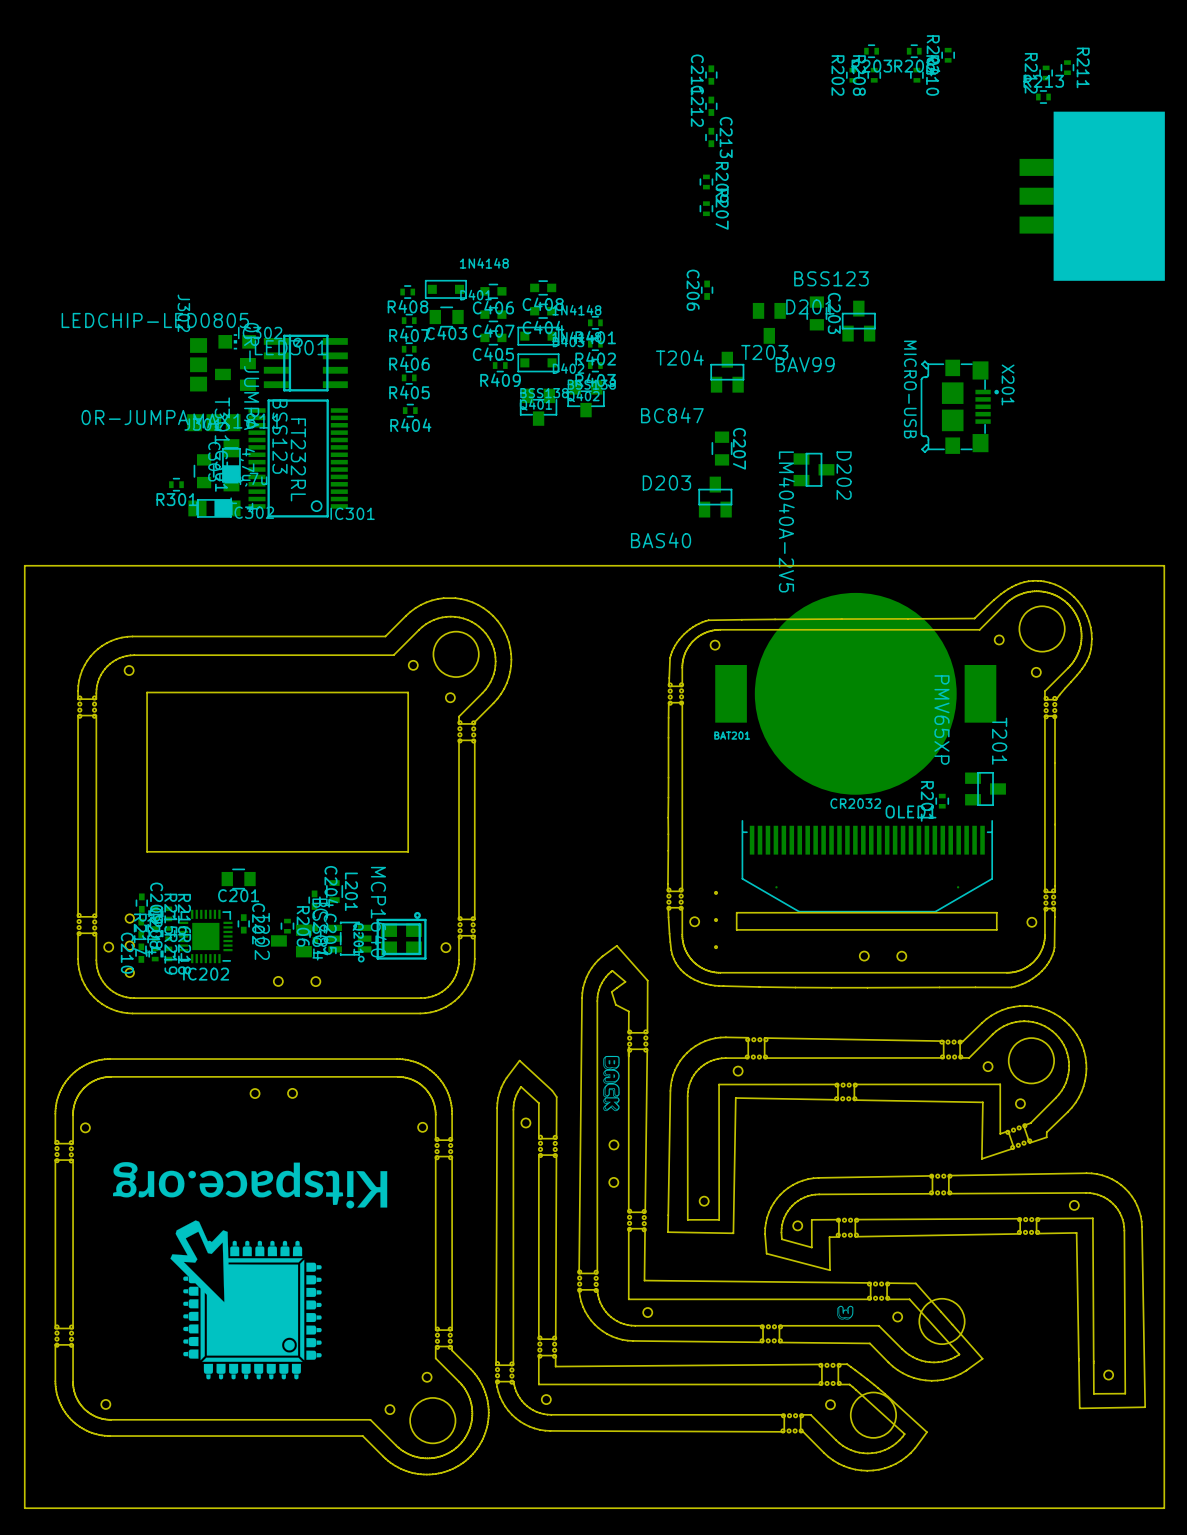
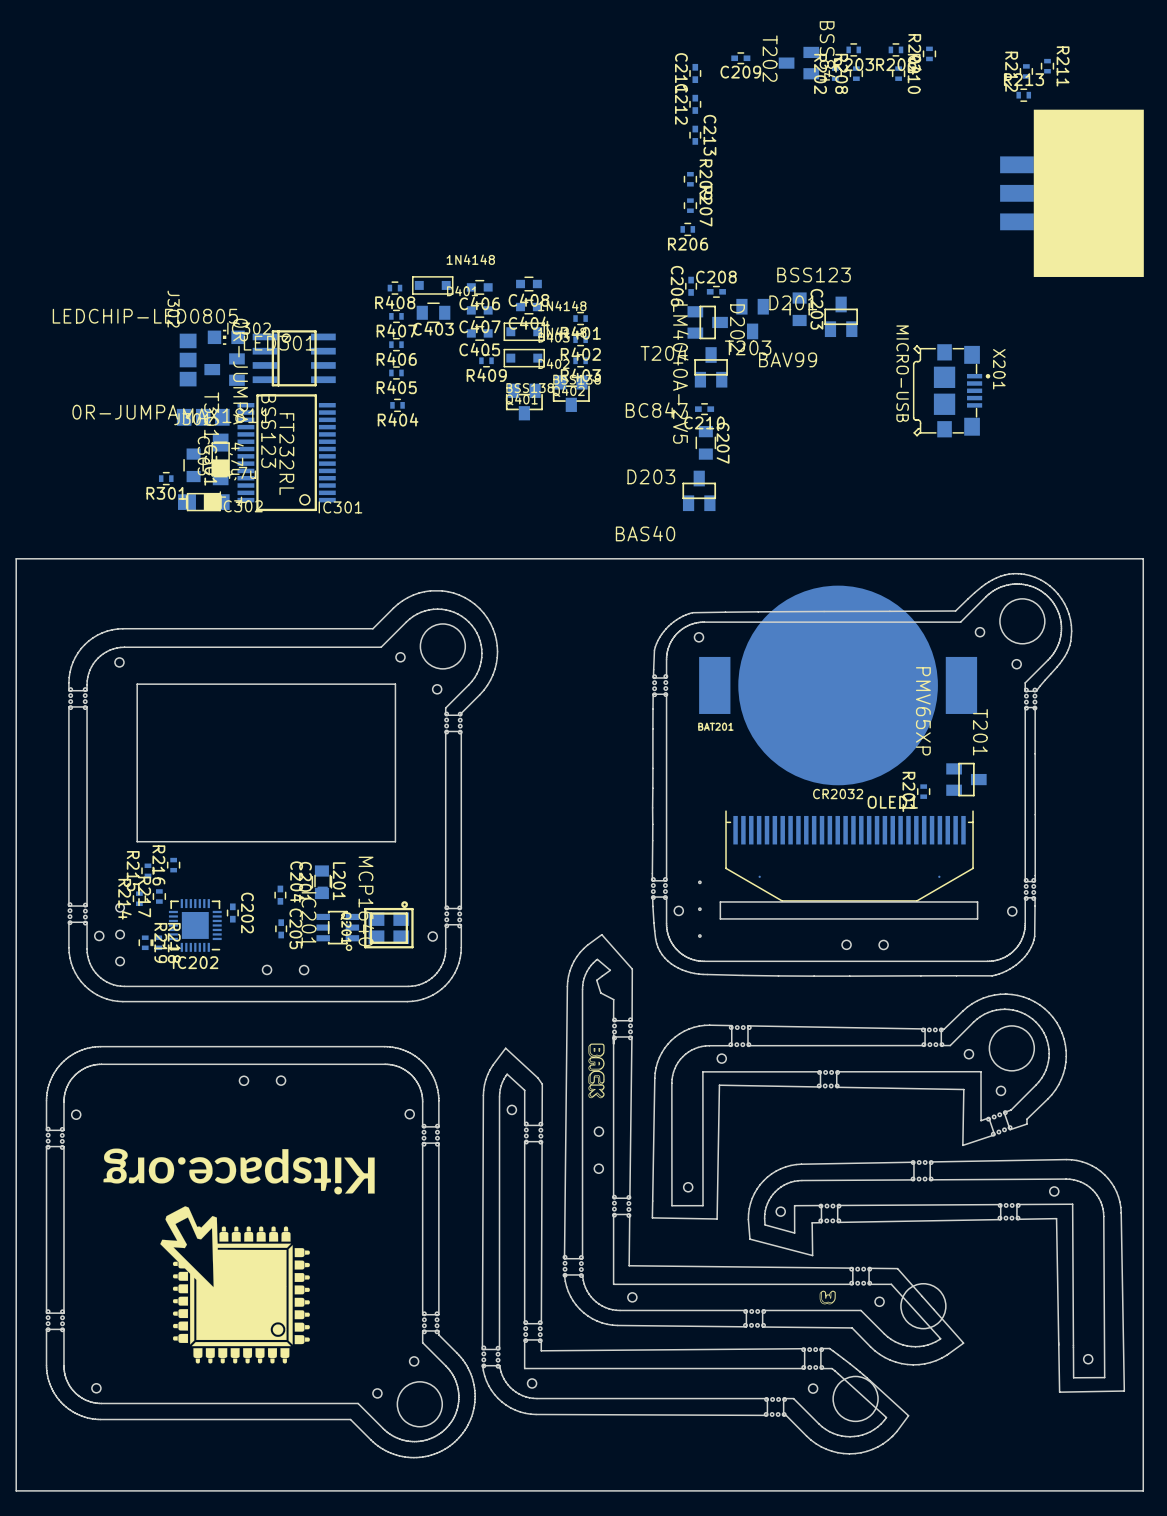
X201 position: (959, 406) -> (951, 390)
D202 position: (813, 469) -> (707, 322)
C201 rotation: 0° (238, 879) -> 90° clockwise (321, 882)
C201 position: (238, 879) -> (321, 882)
C204 position: (314, 900) -> (280, 895)
C209 rotation: 0° (141, 903) -> 90° clockwise (740, 58)
C209 position: (141, 903) -> (740, 58)
R215 position: (155, 913) -> (147, 870)
R216 position: (168, 913) -> (173, 865)
R215 name position: R215 (170, 913) -> R215 (133, 871)
R216 name position: R216 (184, 914) -> R216 (158, 865)
R206 rotation: 0° (287, 926) -> 90° clockwise (687, 229)
R206 position: (287, 926) -> (687, 229)
C208 rotation: 0° (141, 928) -> 90° clockwise (716, 291)
C208 position: (141, 928) -> (716, 291)
R217 position: (155, 933) -> (159, 896)
R214 position: (168, 933) -> (139, 898)
C205 position: (315, 934) -> (281, 928)
T202 position: (291, 940) -> (798, 63)
C210 rotation: 0° (141, 953) -> 90° clockwise (704, 409)
C210 position: (141, 953) -> (704, 409)

